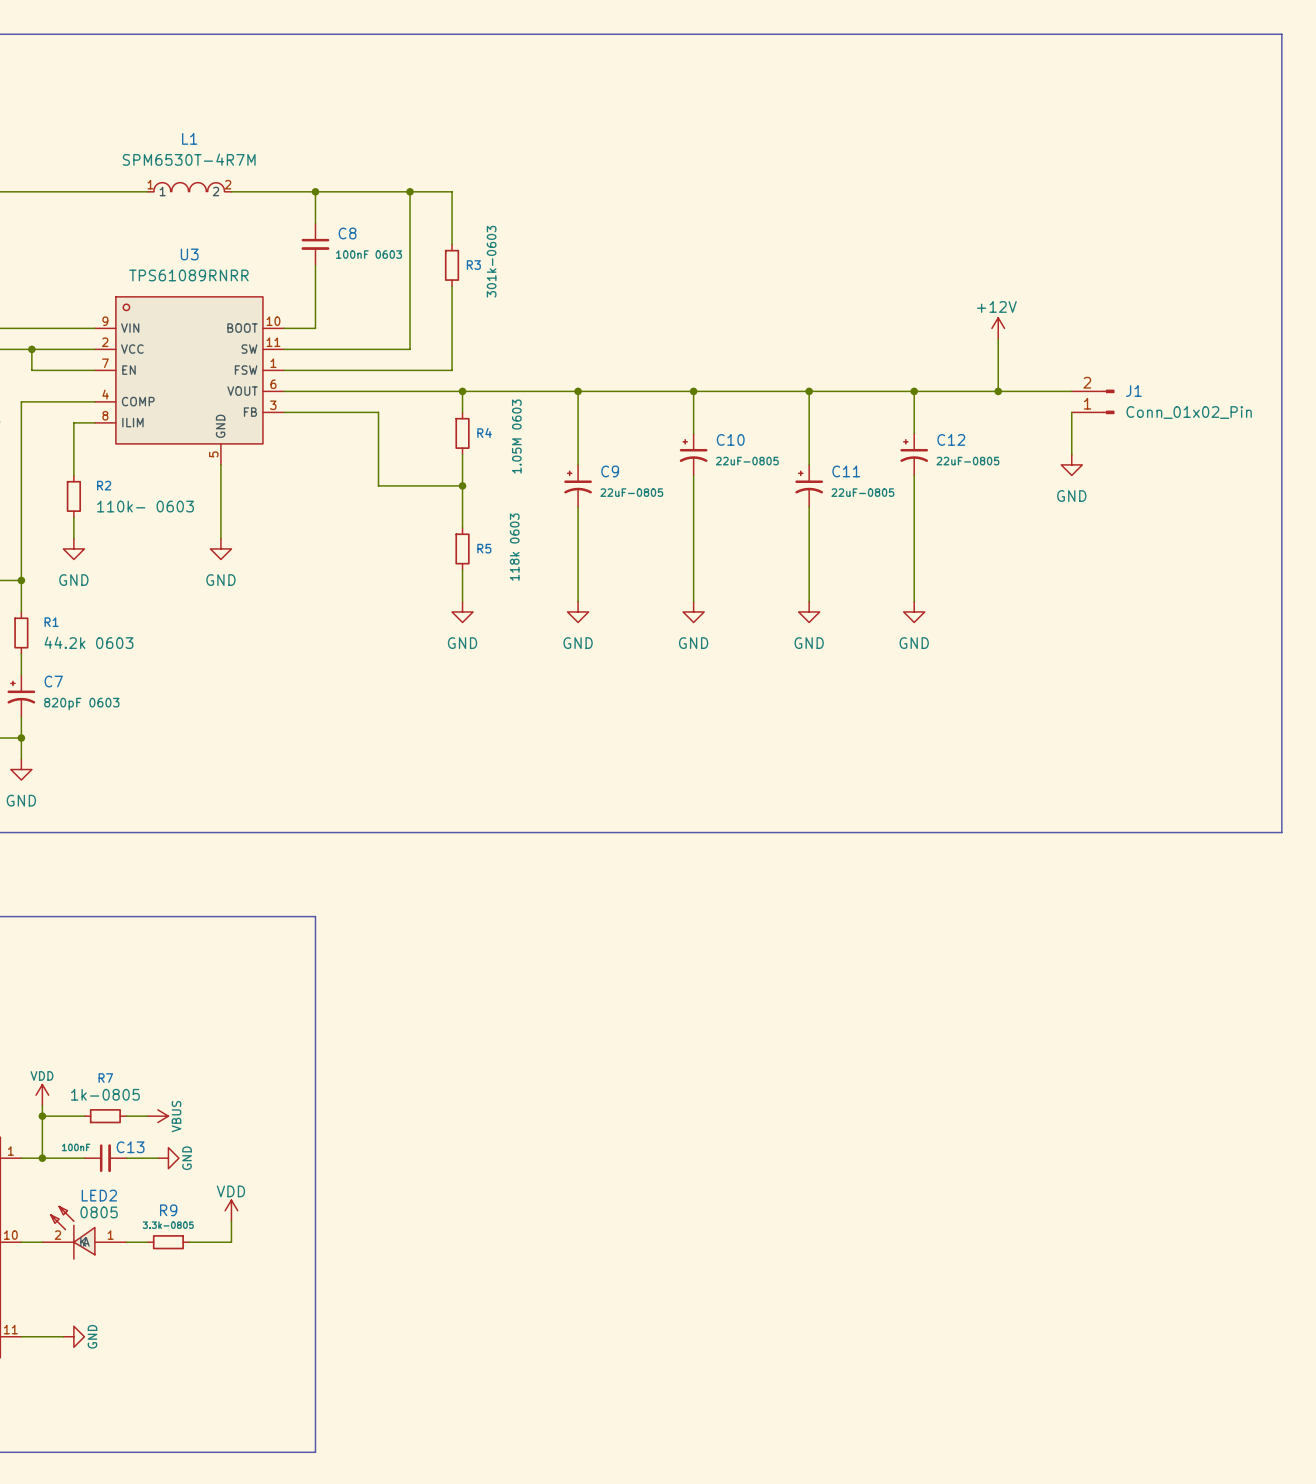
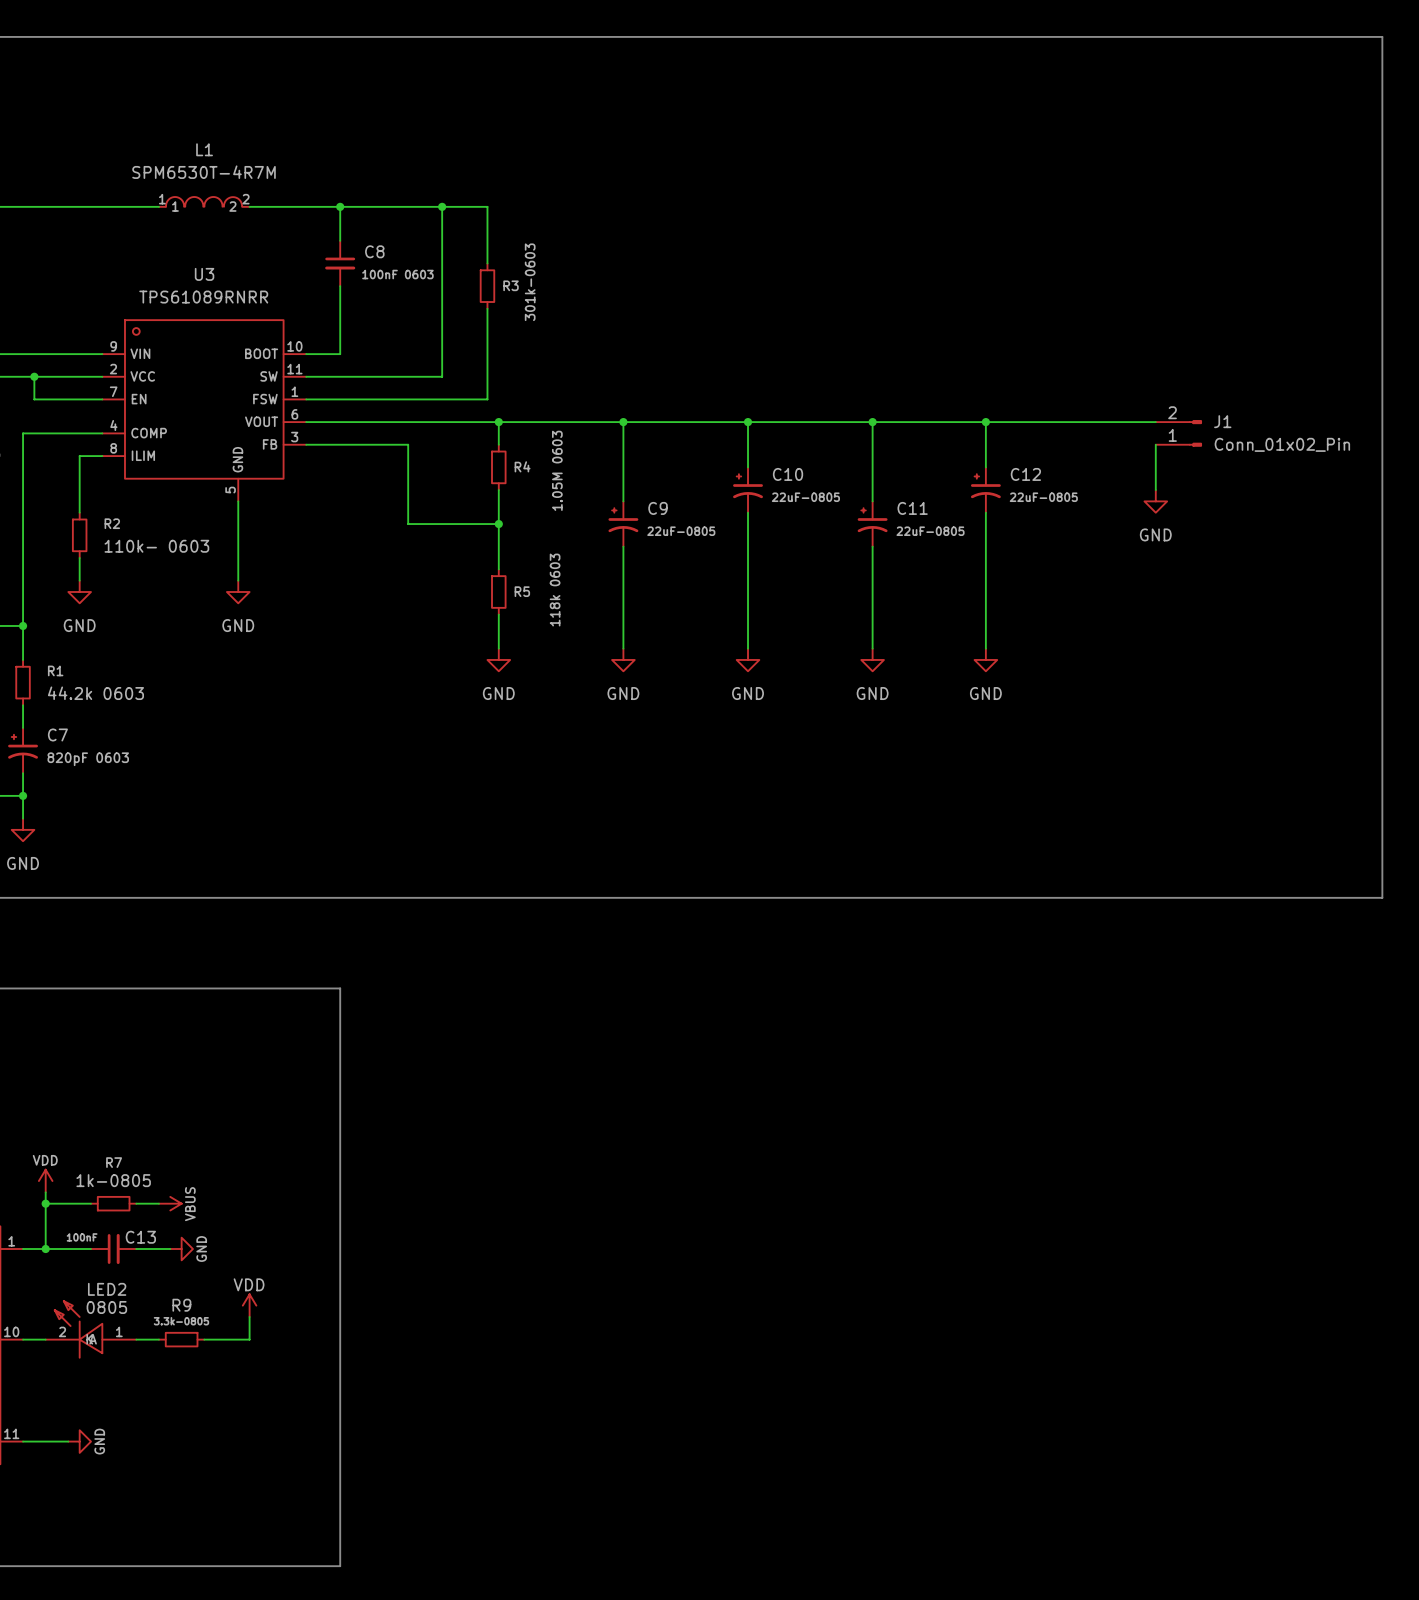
power symbol: +12V (998, 328) -> none
wire: (998, 338) (998, 391) -> none
junction: (998, 391) -> none

